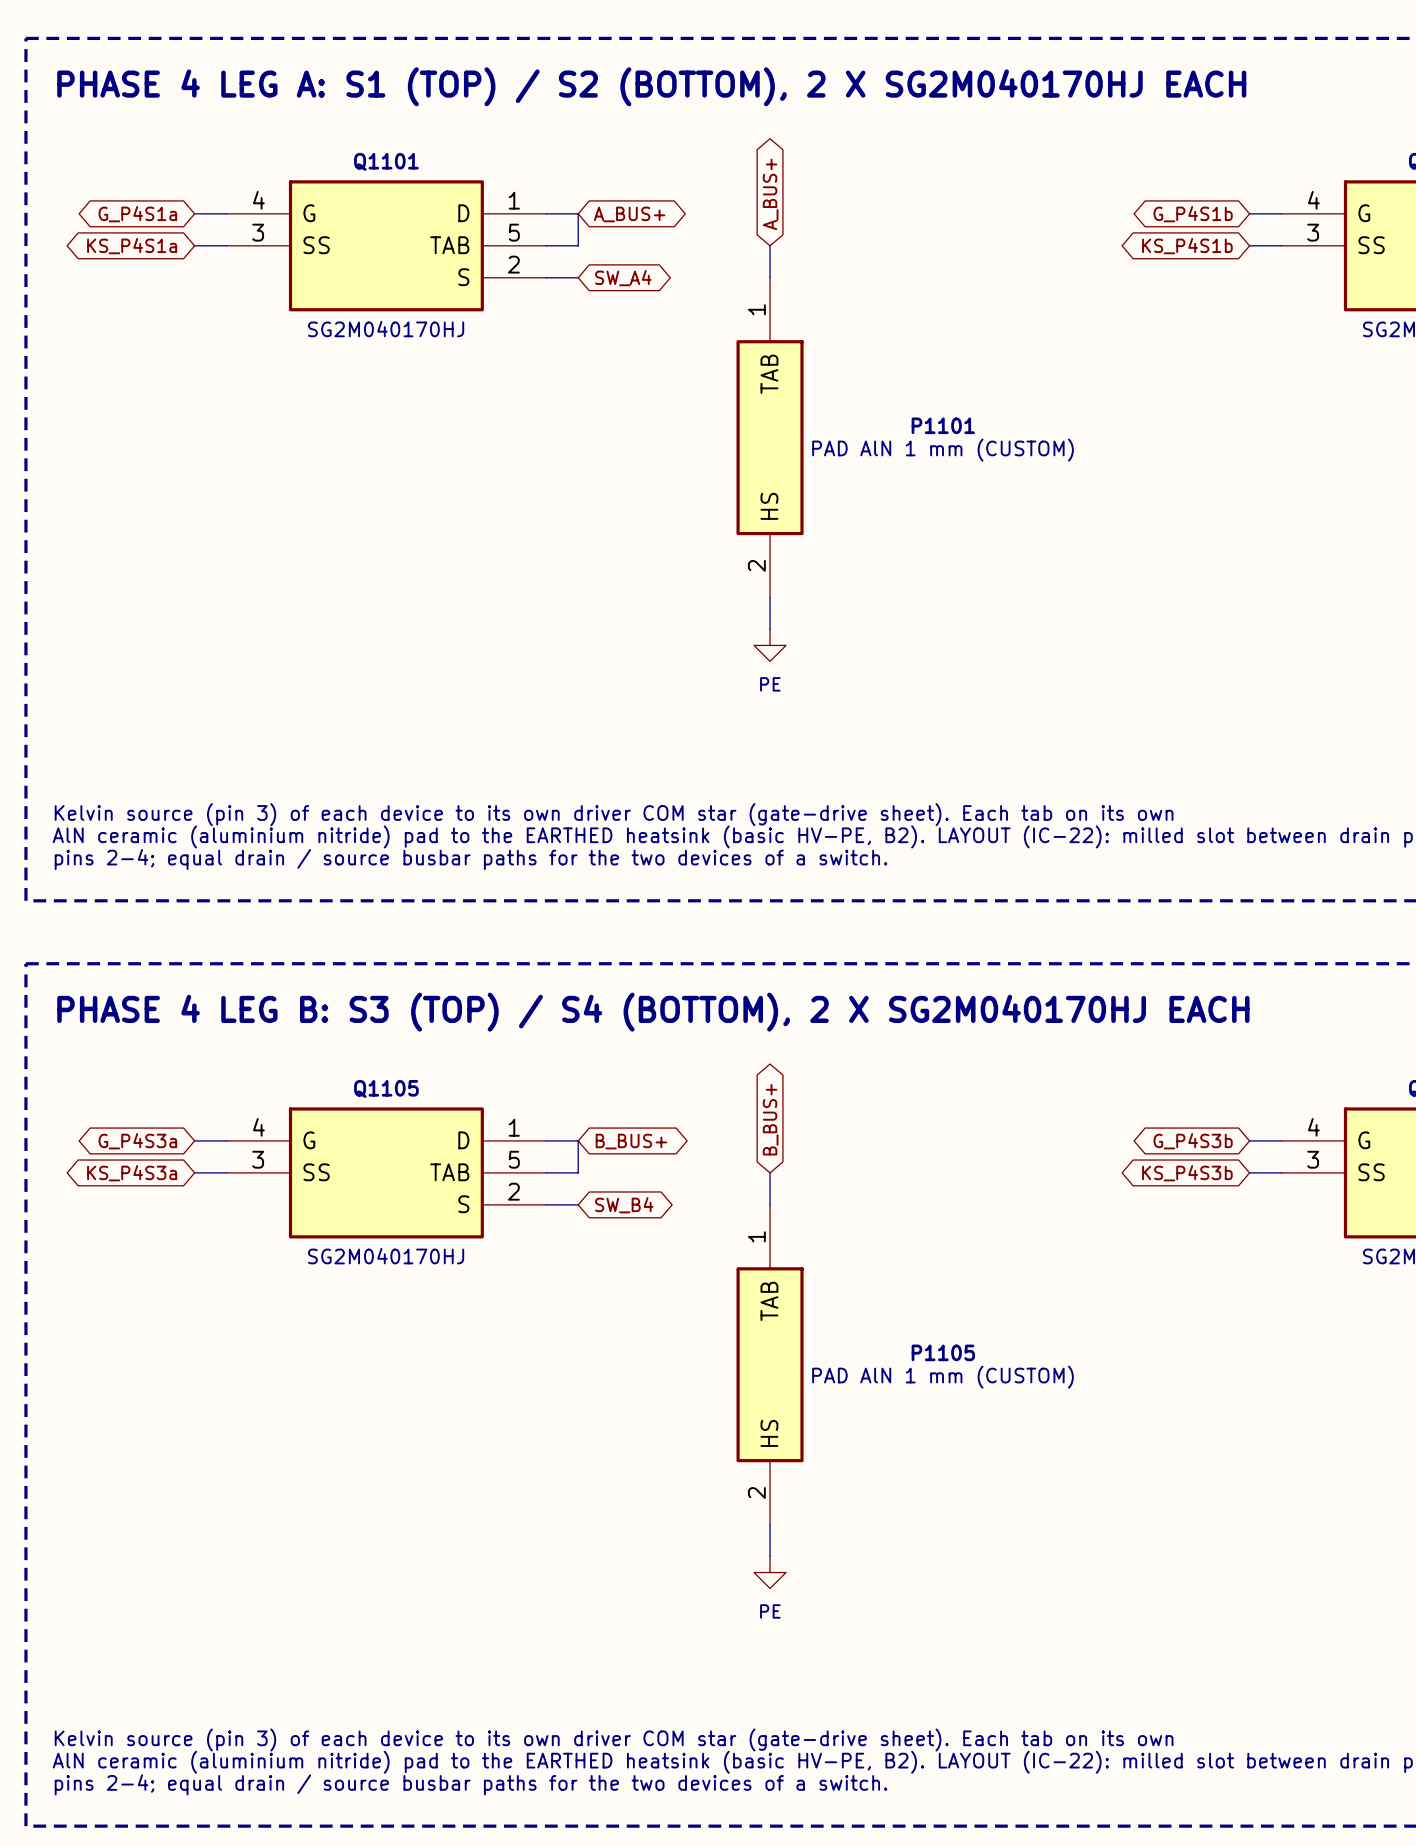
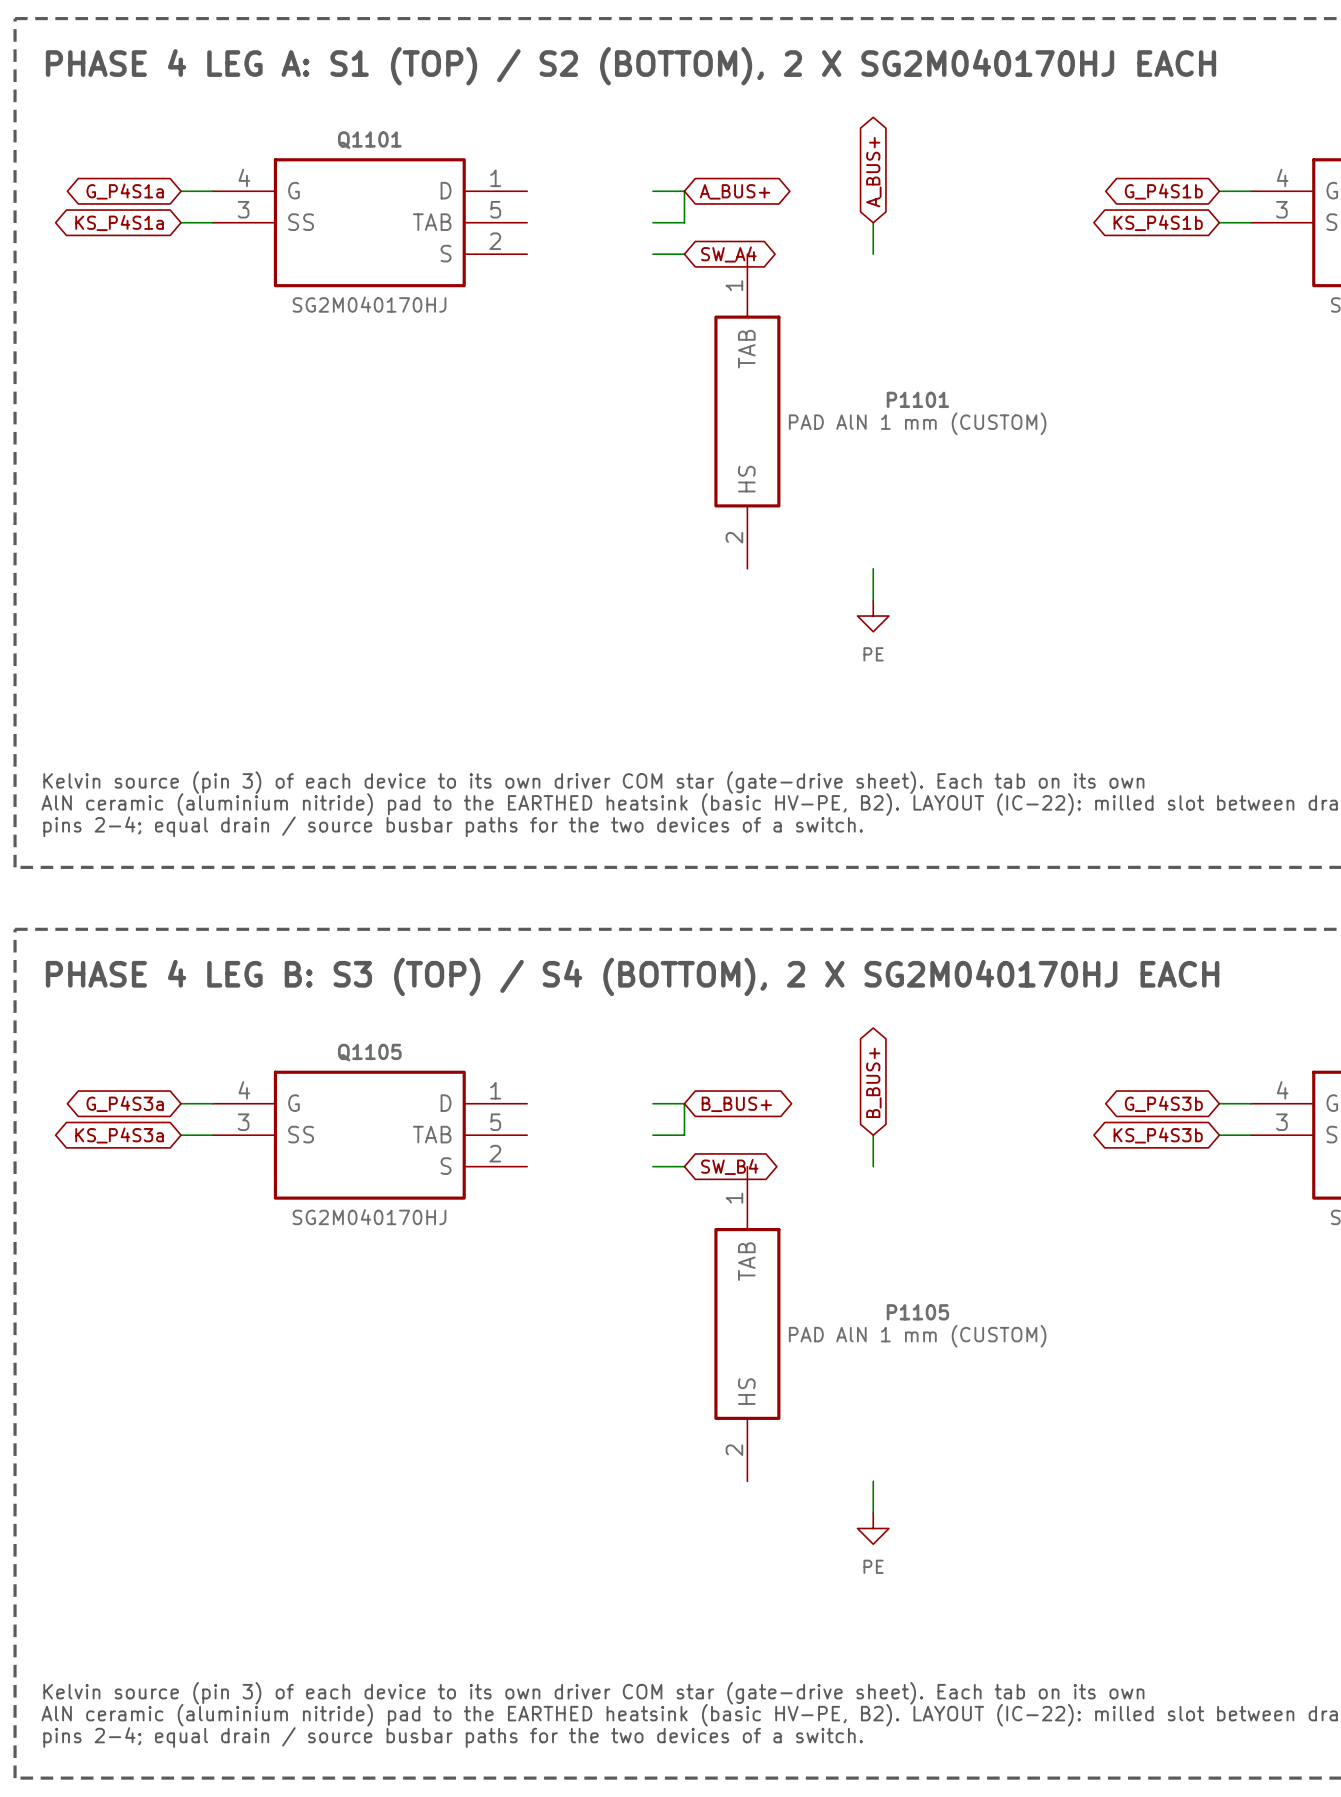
global label rotation: 0° (770, 194) -> 90° clockwise (735, 191)
global label: none -> A_BUS+ (873, 172)
wire: (546, 213) (578, 213) (578, 245) (546, 245) -> (653, 191) (684, 191) (684, 222) (653, 222)
global label: A_BUS+ (629, 214) -> none
wire: (770, 245) (770, 277) -> (873, 222) (873, 254)
wire: (546, 277) (578, 277) -> (653, 254) (684, 254)
global label position: SW_A4 (623, 278) -> SW_A4 (728, 254)
wire: (770, 597) (770, 629) -> (873, 568) (873, 600)
power symbol position: PE (770, 645) -> PE (873, 616)
global label rotation: 0° (770, 1119) -> 90° clockwise (736, 1104)
global label: none -> B_BUS+ (873, 1082)
wire: (546, 1140) (578, 1140) (578, 1172) (546, 1172) -> (653, 1103) (684, 1103) (684, 1135) (653, 1135)
global label: B_BUS+ (631, 1141) -> none
wire: (770, 1172) (770, 1204) -> (873, 1135) (873, 1166)
wire: (546, 1204) (578, 1204) -> (653, 1166) (684, 1166)
global label position: SW_B4 (624, 1205) -> SW_B4 (729, 1166)
wire: (770, 1524) (770, 1556) -> (873, 1481) (873, 1512)
power symbol position: PE (770, 1572) -> PE (873, 1528)

